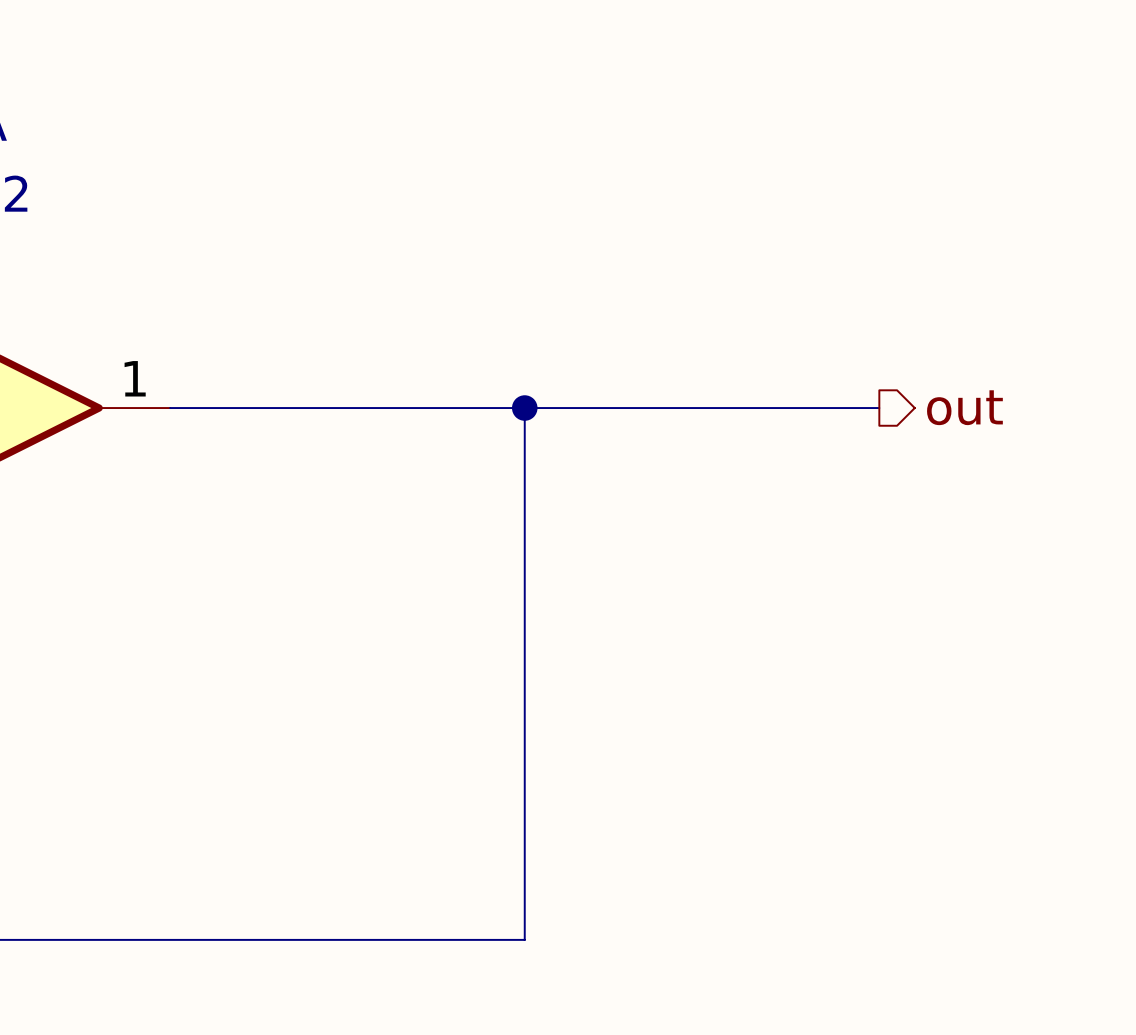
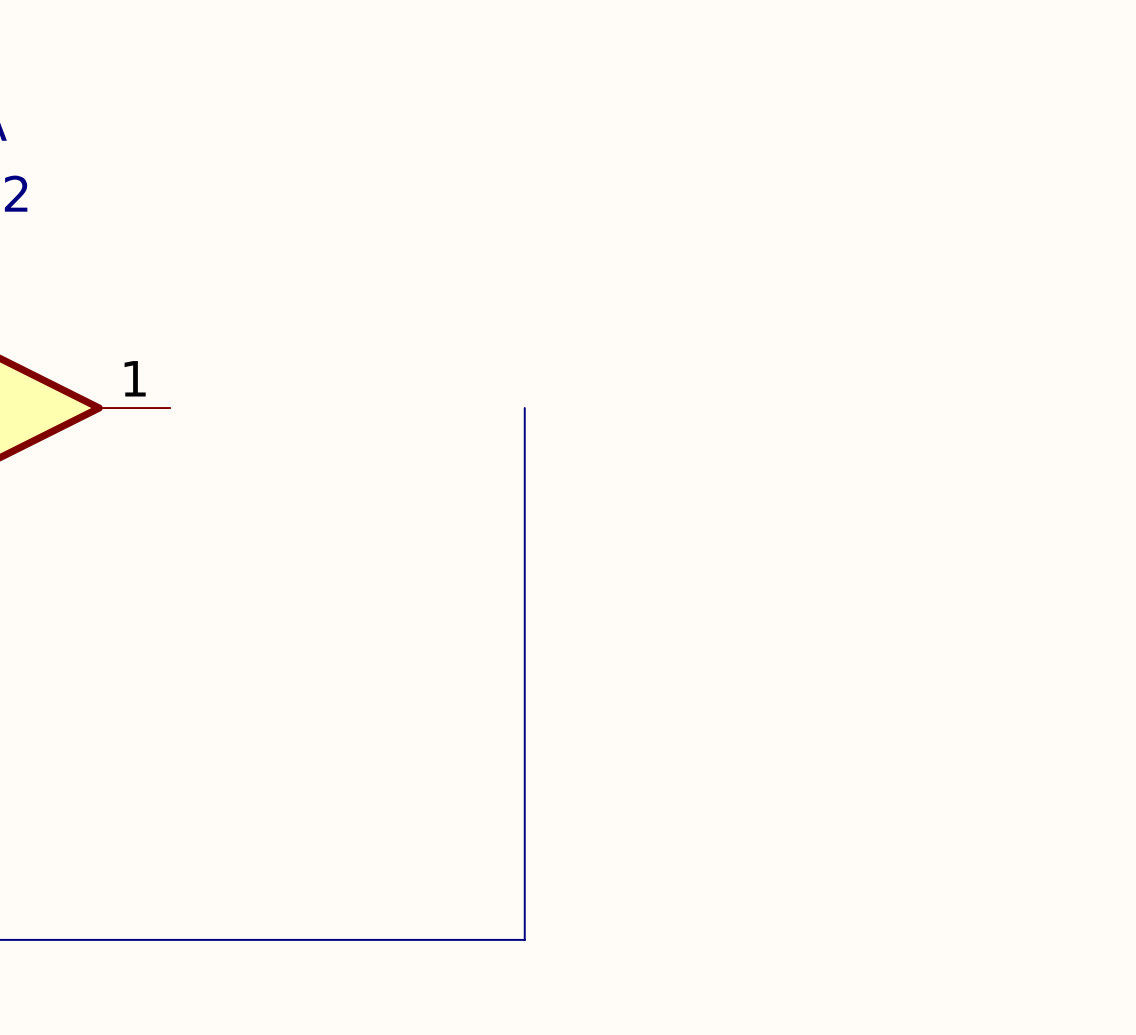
hierarchical label: out (964, 407) -> none
wire: (170, 408) (879, 408) -> none
junction: (524, 408) -> none

